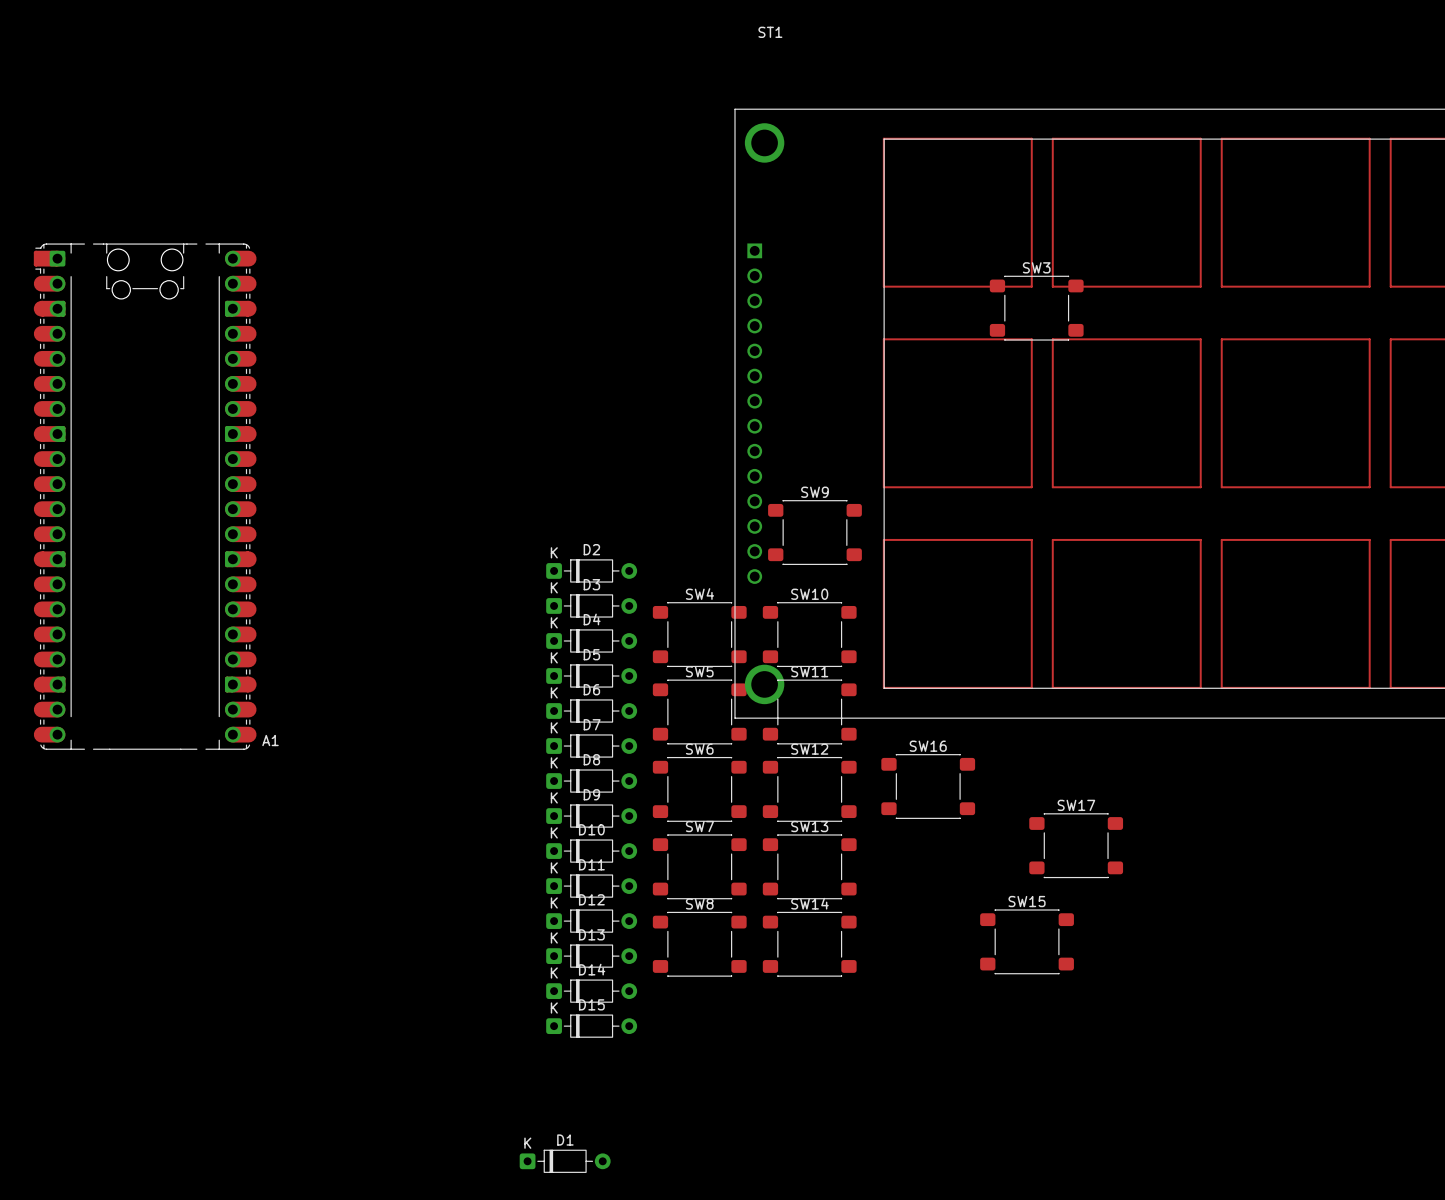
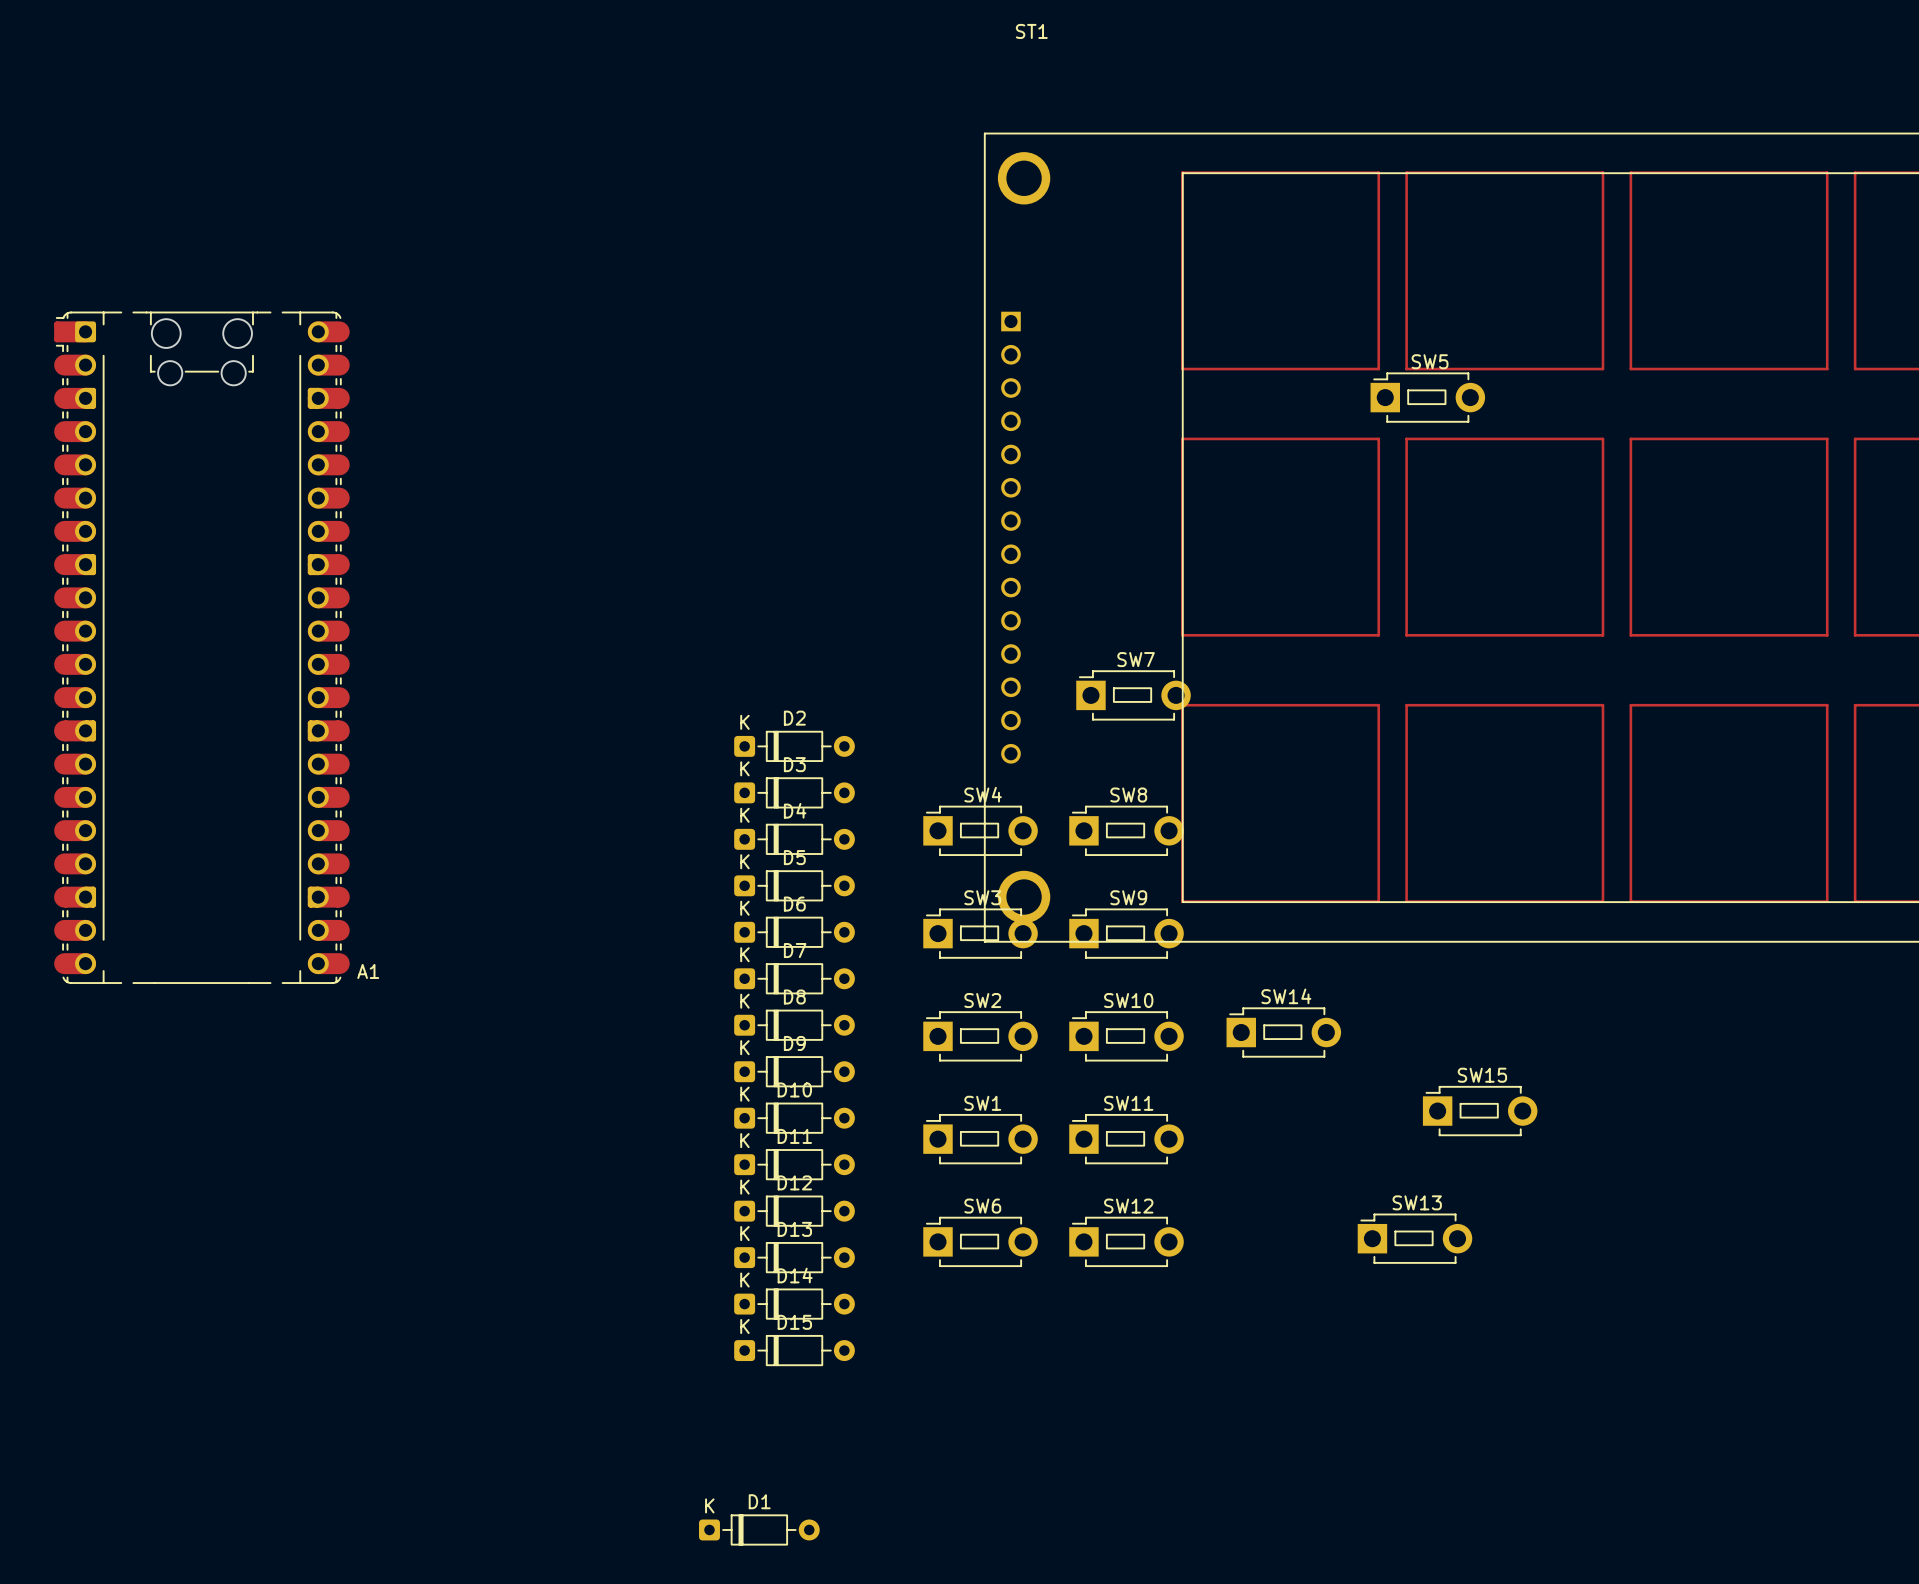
SW3 footprint: [989, 275, 1084, 341] -> [923, 908, 1038, 959]
SW9 footprint: [768, 500, 862, 565] -> [1069, 908, 1184, 959]
SW4 footprint: [652, 602, 747, 668] -> [923, 805, 1038, 856]
SW10 footprint: [762, 602, 857, 668] -> [1069, 1011, 1184, 1062]
SW5 footprint: [652, 679, 747, 745] -> [1370, 372, 1486, 423]
SW11 footprint: [762, 679, 857, 745] -> [1069, 1114, 1184, 1165]
SW6 footprint: [652, 756, 747, 822] -> [923, 1216, 1038, 1267]
SW12 footprint: [762, 756, 857, 822] -> [1069, 1216, 1184, 1267]
SW16: (928, 786) -> none
SW2: none -> (980, 1036)
SW7 footprint: [652, 834, 747, 900] -> [1076, 670, 1191, 721]
SW13 footprint: [762, 834, 857, 900] -> [1357, 1213, 1473, 1264]
SW17: (1076, 845) -> none
SW1: none -> (980, 1139)
SW15 footprint: [980, 909, 1074, 975] -> [1422, 1086, 1538, 1137]
SW8 footprint: [652, 911, 747, 977] -> [1069, 805, 1184, 856]
SW14 footprint: [762, 911, 857, 977] -> [1226, 1007, 1342, 1058]

